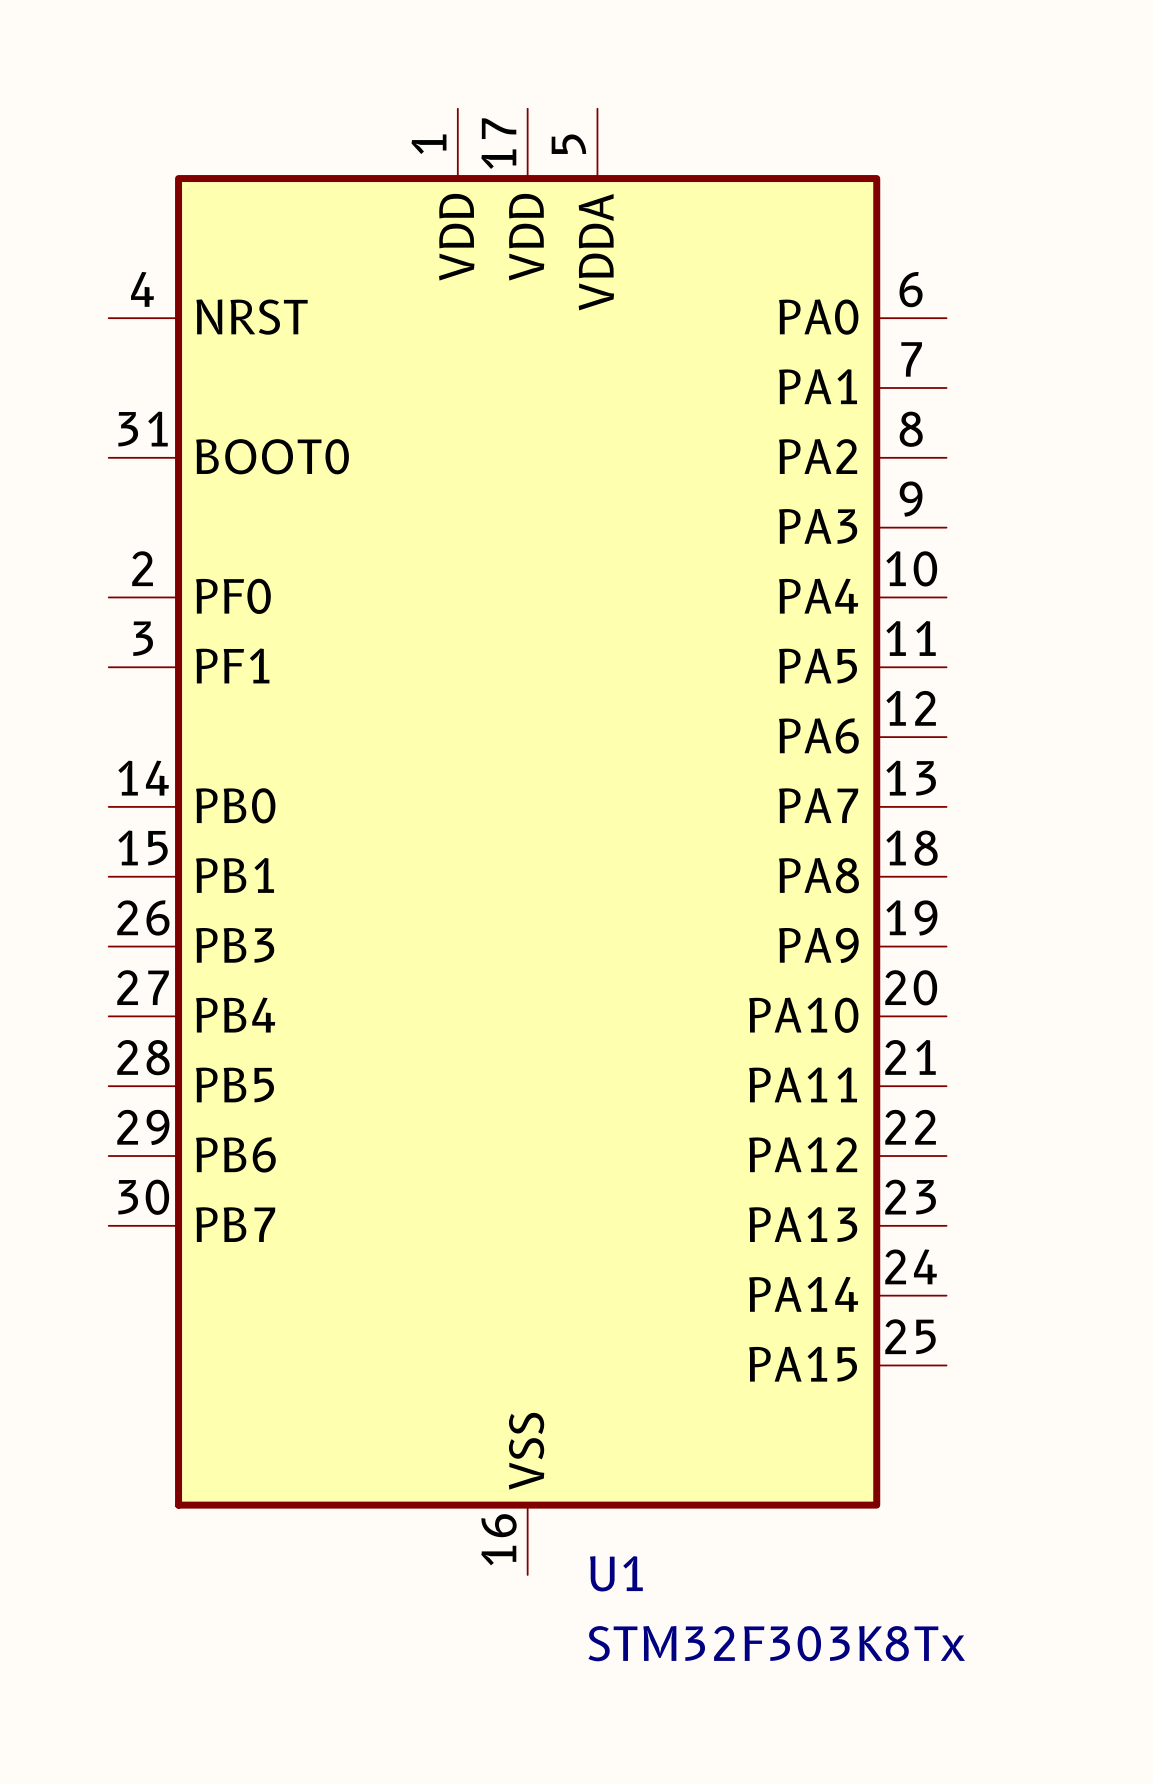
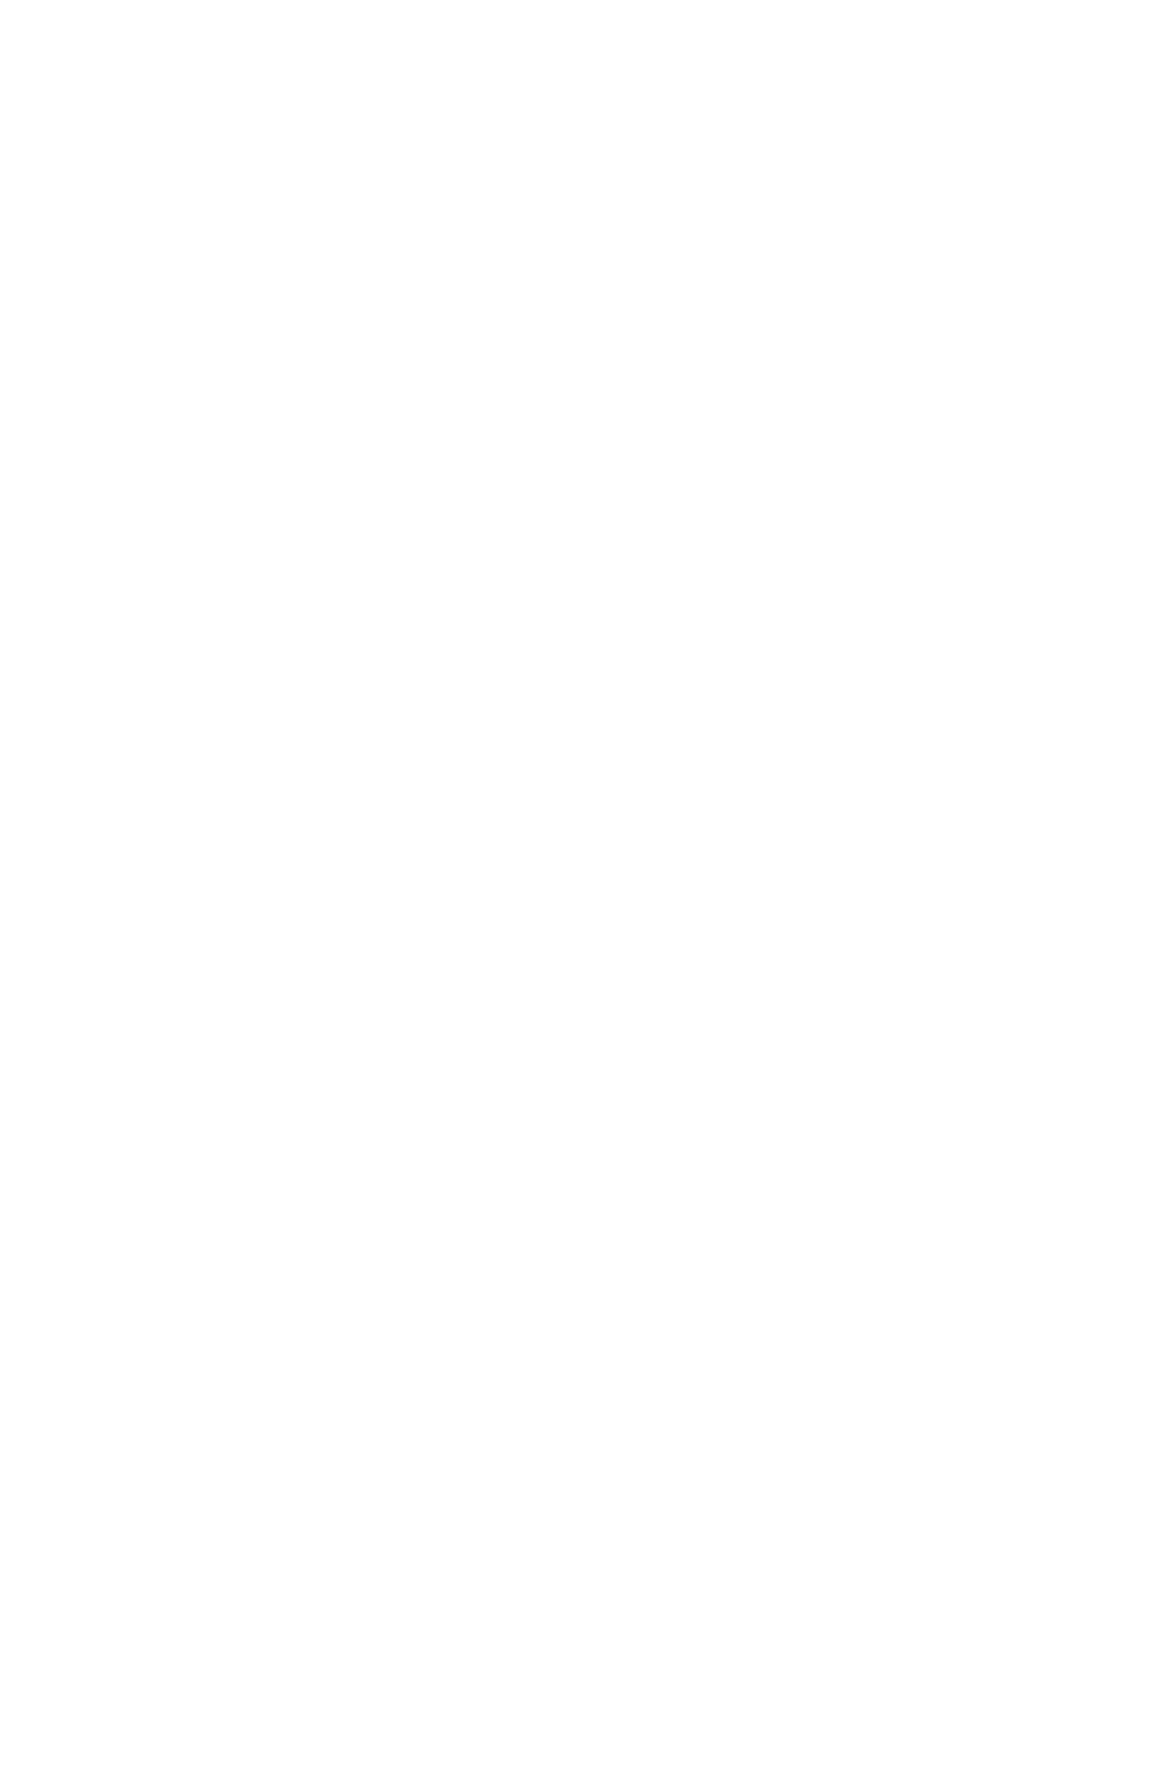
U1: STM32F303K8Tx (527, 841) -> none

